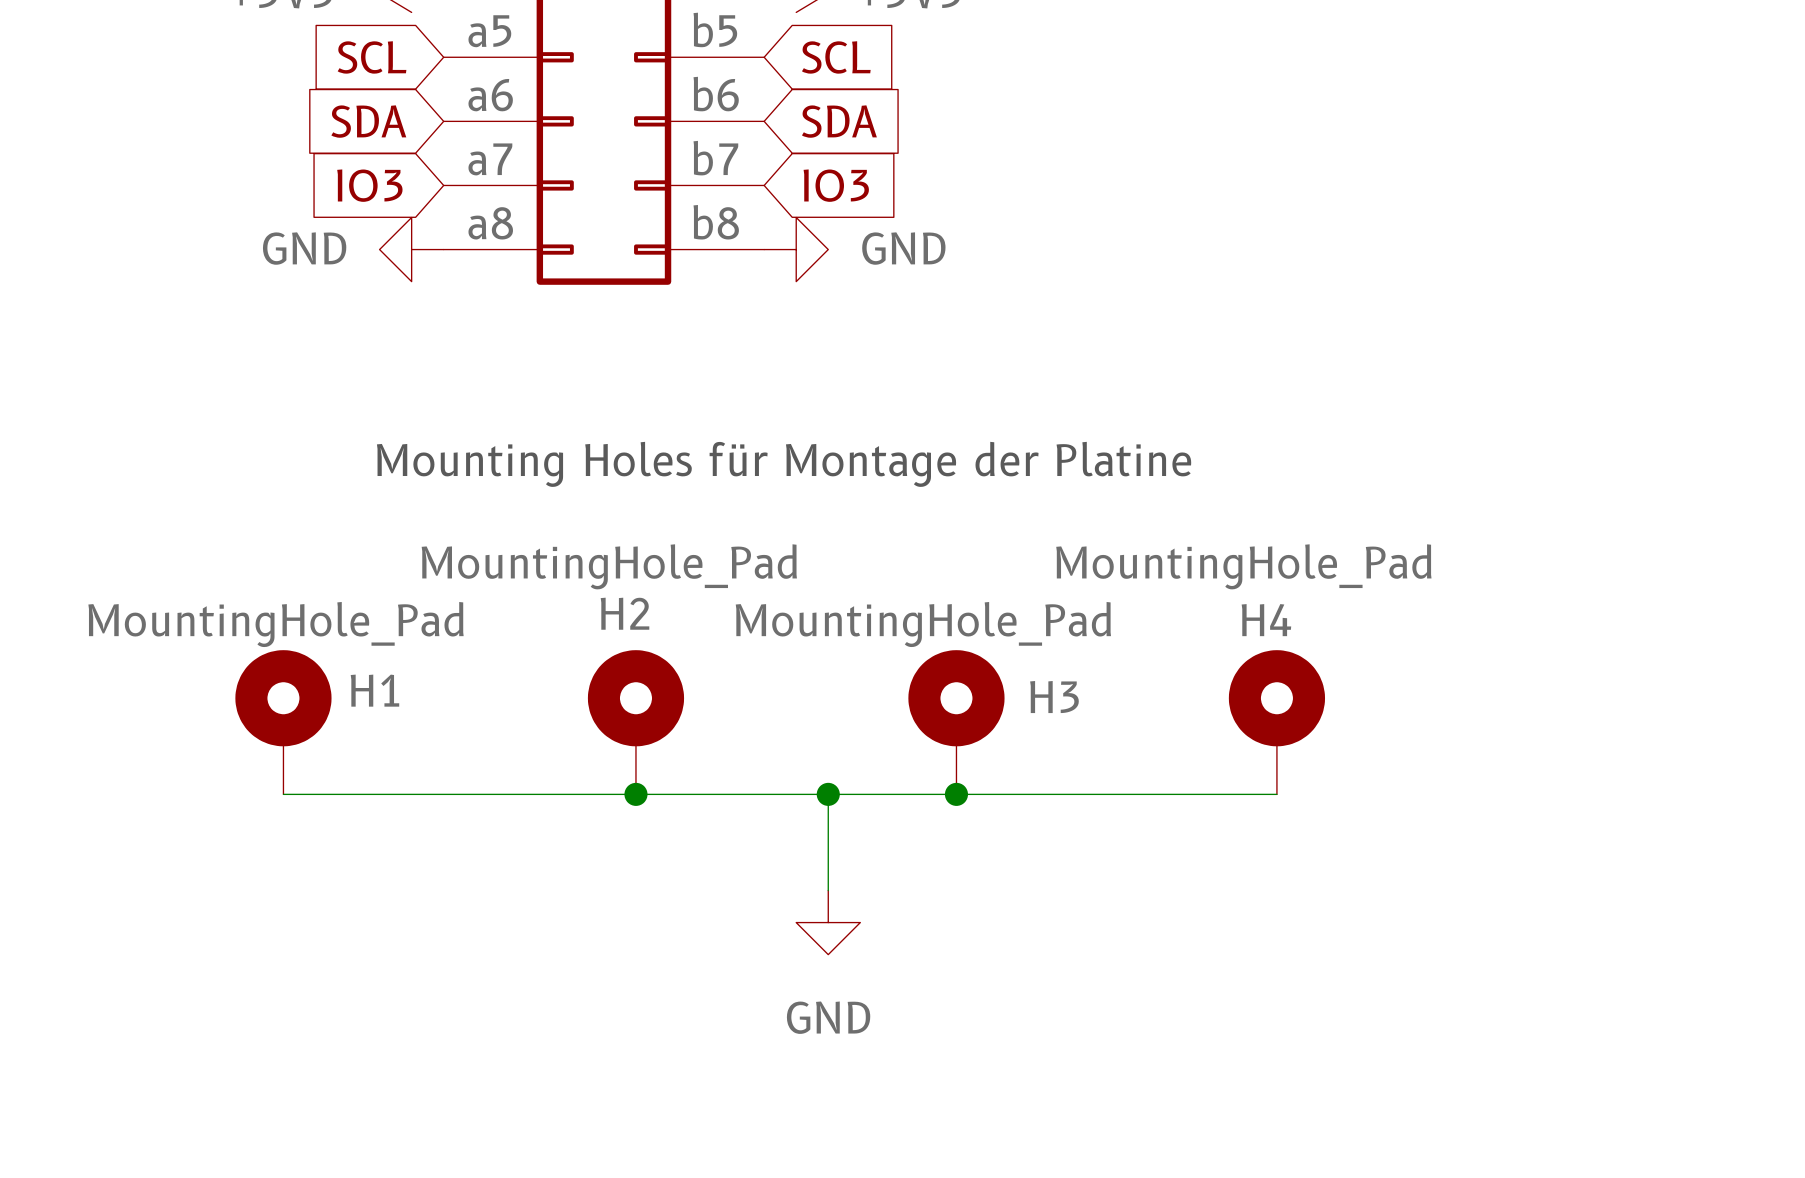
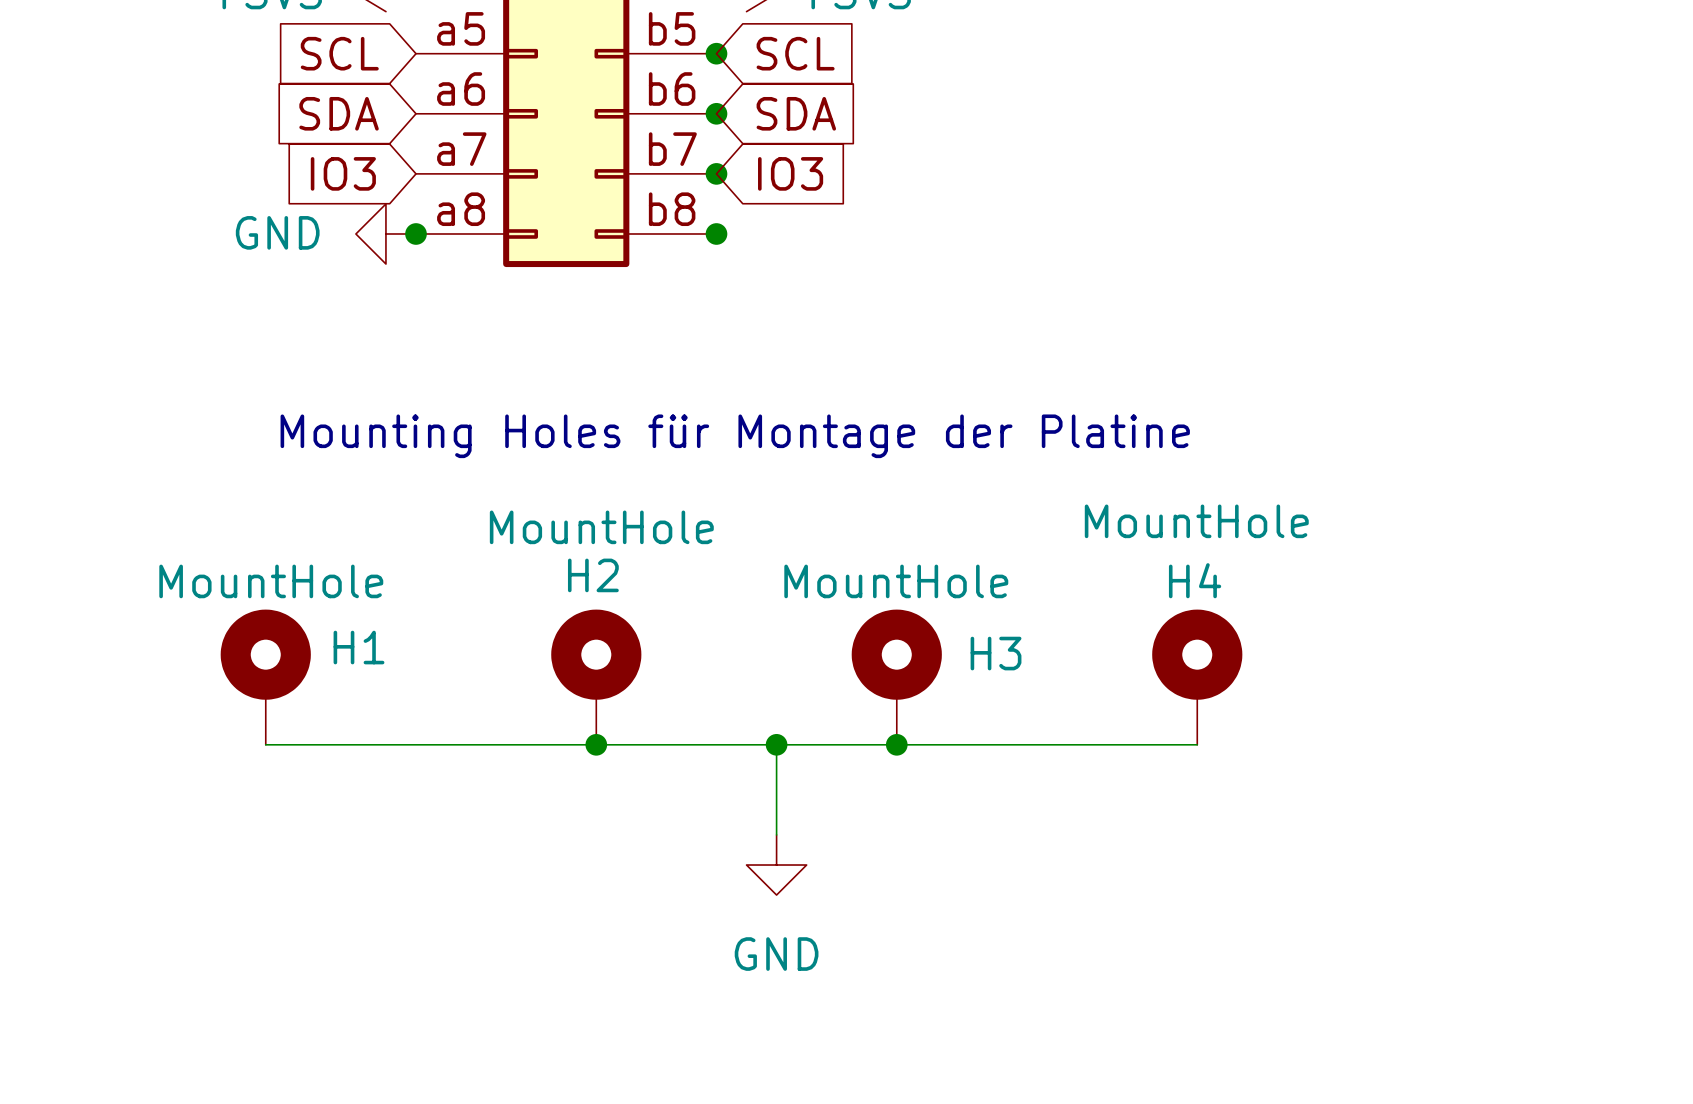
junction: none -> (716, 53)
junction: none -> (716, 113)
junction: none -> (716, 173)
junction: none -> (416, 233)
junction: none -> (716, 233)
power symbol: GND (796, 249) -> none
H2 value: MountingHole_Pad (609, 566) -> MountHole (601, 527)
H4 value: MountingHole_Pad (1243, 566) -> MountHole (1196, 521)
H1 value: MountingHole_Pad (276, 624) -> MountHole (271, 581)
H3 value: MountingHole_Pad (923, 624) -> MountHole (896, 581)

